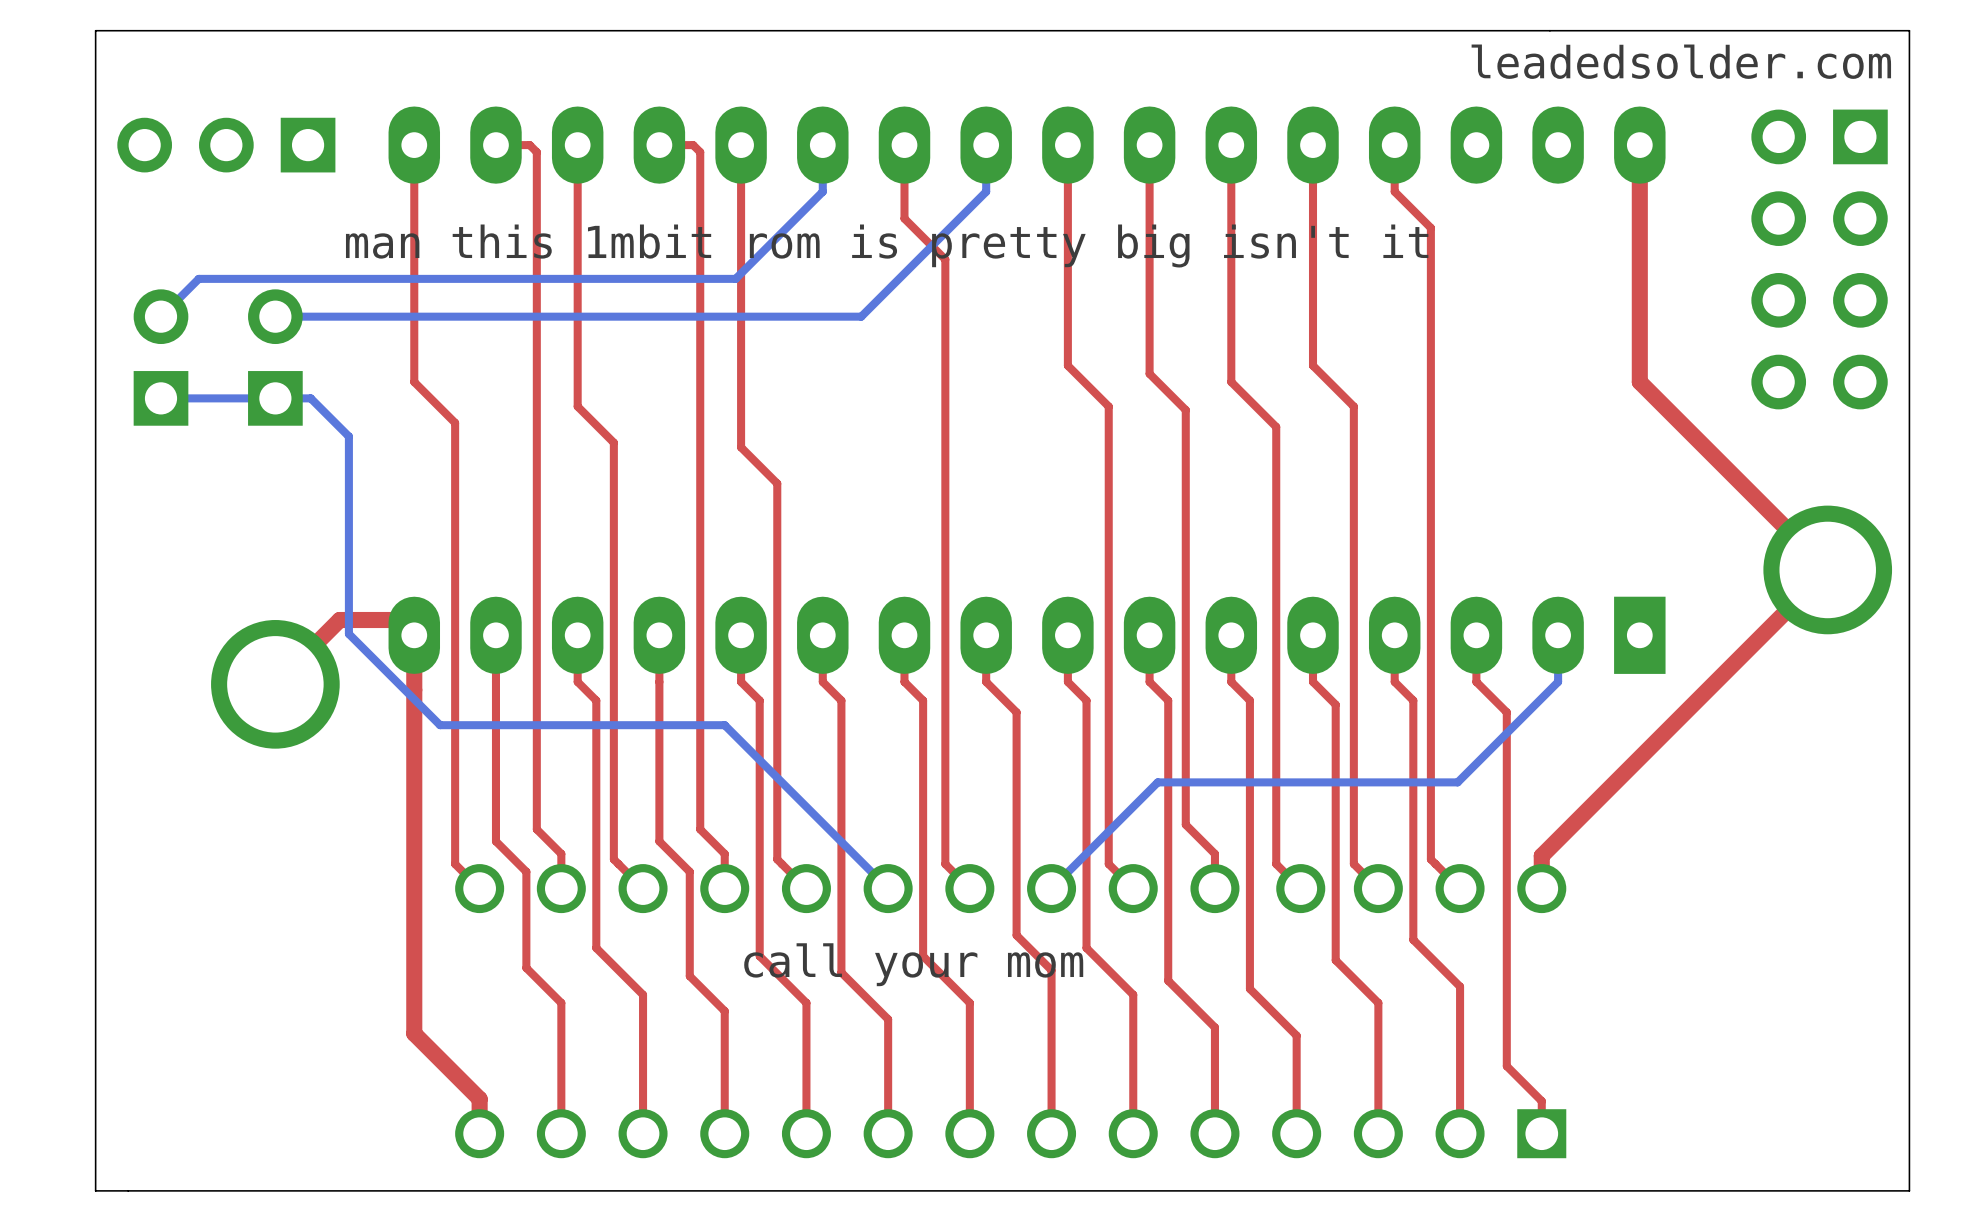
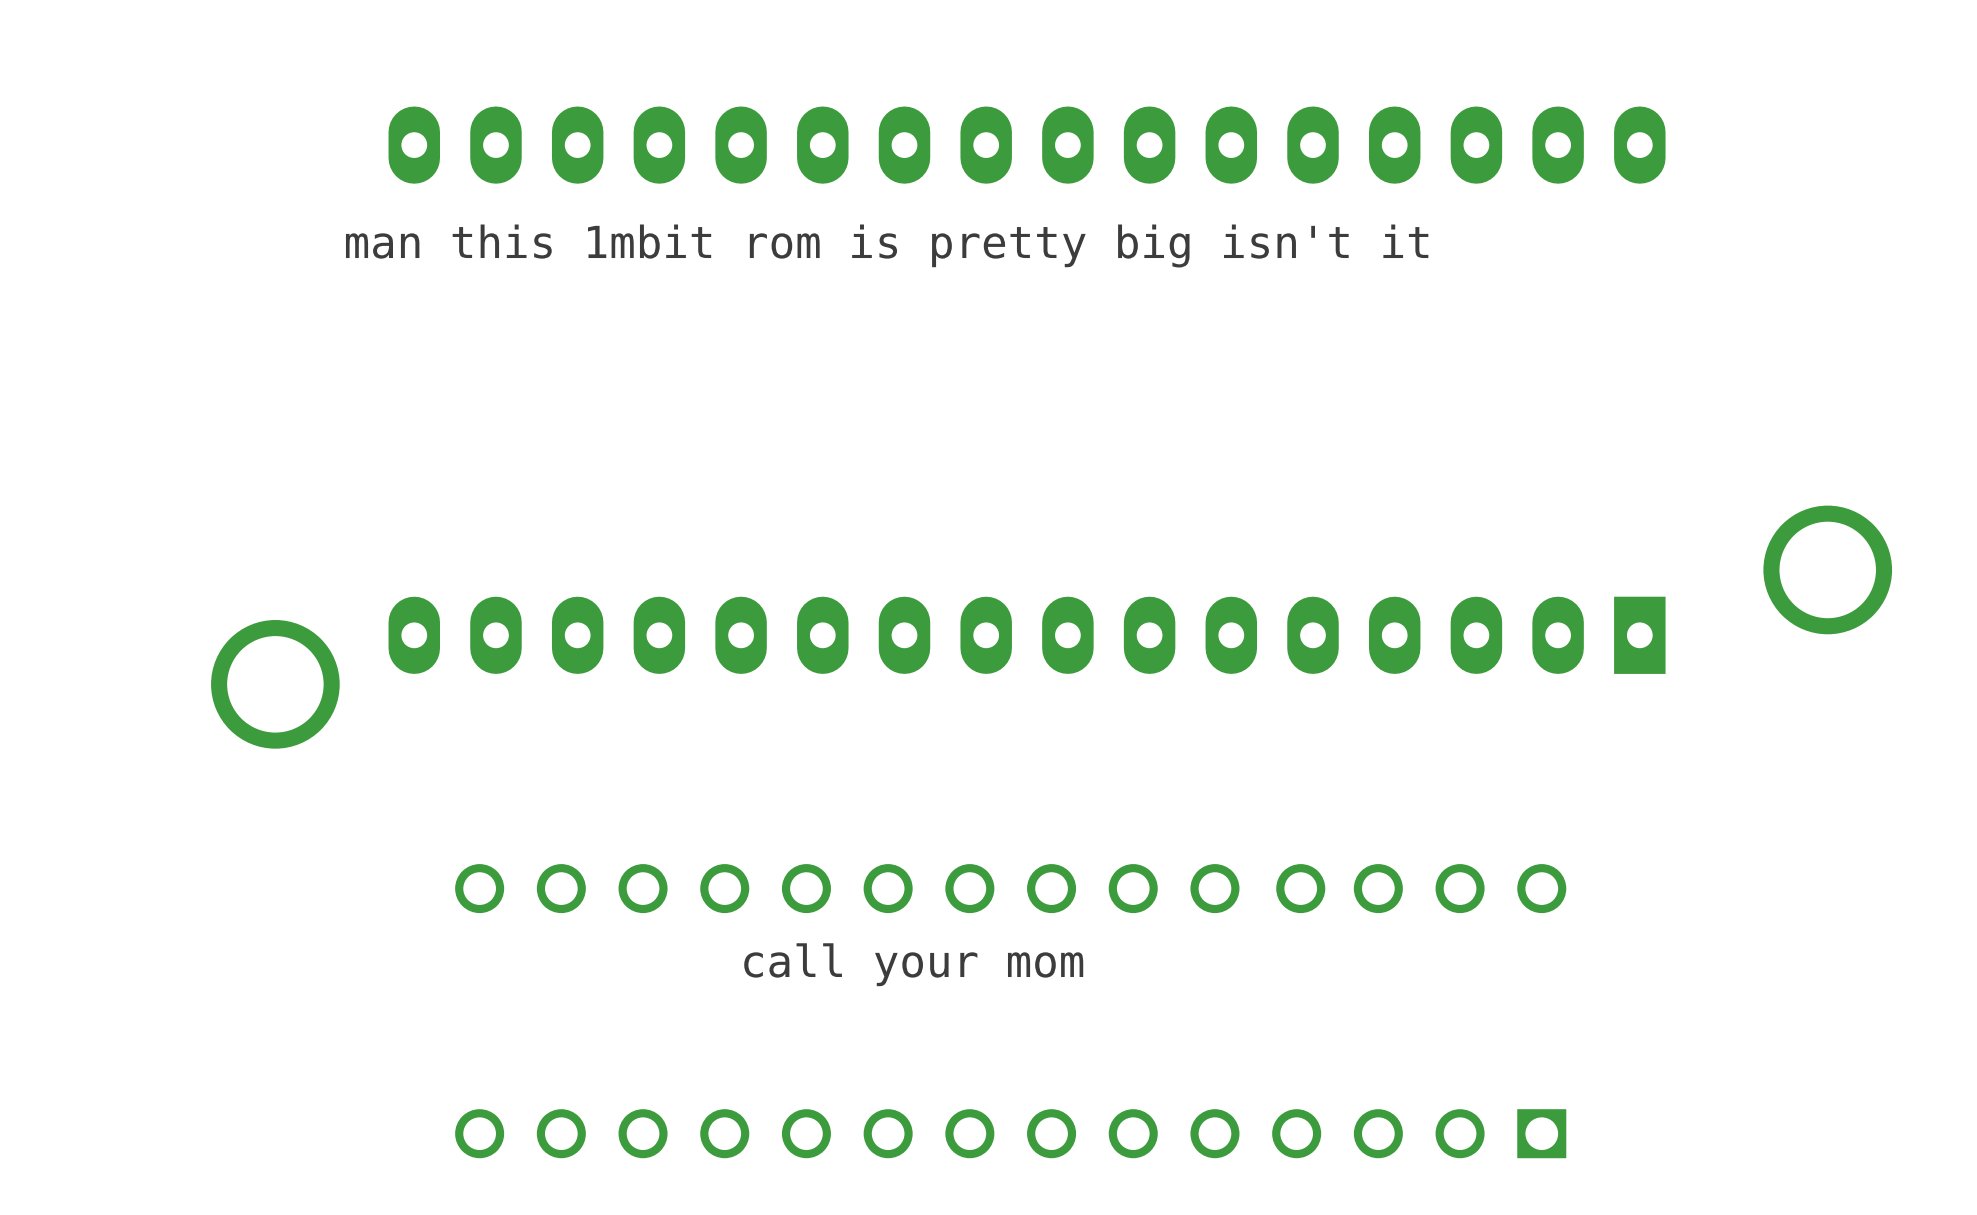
board edge: (1909, 30) (95, 30) (95, 1190) (1909, 1190) (1909, 30) -> none
text: leadedsolder.com (1681, 61) -> none
part: (226, 145) -> none
top track: (414, 145) (414, 382) (455, 422) (455, 864) (479, 888) -> none
top track: (495, 145) (529, 145) (536, 152) (536, 829) (561, 853) (561, 888) -> none
top track: (577, 145) (577, 406) (613, 442) (613, 859) (643, 888) -> none
top track: (659, 145) (693, 145) (700, 152) (700, 829) (724, 853) (724, 888) -> none
top track: (741, 145) (741, 447) (777, 483) (777, 859) (806, 888) -> none
bottom track: (822, 145) (822, 191) (735, 278) (198, 278) (161, 316) -> none
top track: (904, 145) (904, 218) (945, 259) (945, 864) (969, 888) -> none
bottom track: (986, 145) (986, 191) (861, 316) (275, 316) -> none
top track: (1067, 145) (1067, 365) (1108, 406) (1108, 864) (1133, 888) -> none
top track: (1149, 145) (1149, 373) (1185, 410) (1185, 824) (1214, 853) (1214, 888) -> none
top track: (1231, 145) (1231, 382) (1276, 426) (1276, 864) (1300, 888) -> none
top track: (1313, 145) (1313, 365) (1353, 406) (1353, 864) (1378, 888) -> none
top track: (1394, 145) (1394, 191) (1430, 227) (1430, 859) (1460, 888) -> none
top track: (1639, 145) (1639, 382) (1827, 569) (1541, 855) (1541, 888) -> none
part: (1819, 259) -> none
part: (161, 357) -> none
part: (275, 357) -> none
bottom track: (161, 398) (310, 398) (348, 436) (348, 633) (440, 725) (724, 725) (888, 888) -> none
top track: (495, 635) (495, 841) (526, 871) (526, 968) (561, 1002) (561, 1133) -> none
top track: (577, 635) (577, 681) (596, 700) (596, 948) (643, 994) (643, 1133) -> none
top track: (659, 635) (659, 841) (689, 871) (689, 976) (724, 1011) (724, 1133) -> none
top track: (741, 635) (741, 681) (759, 700) (759, 956) (806, 1002) (806, 1133) -> none
top track: (822, 635) (822, 681) (841, 700) (841, 972) (888, 1019) (888, 1133) -> none
top track: (904, 635) (904, 681) (923, 700) (923, 956) (969, 1002) (969, 1133) -> none
top track: (986, 635) (986, 681) (1016, 712) (1016, 935) (1051, 970) (1051, 1133) -> none
top track: (1067, 635) (1067, 681) (1086, 700) (1086, 948) (1133, 994) (1133, 1133) -> none
top track: (1149, 635) (1149, 681) (1168, 700) (1168, 980) (1214, 1027) (1214, 1133) -> none
top track: (1231, 635) (1231, 681) (1249, 700) (1249, 988) (1296, 1035) (1296, 1133) -> none
top track: (1313, 635) (1313, 681) (1335, 704) (1335, 960) (1378, 1002) (1378, 1133) -> none
top track: (1394, 635) (1394, 681) (1413, 700) (1413, 939) (1460, 986) (1460, 1133) -> none
top track: (1476, 635) (1476, 681) (1506, 712) (1506, 1066) (1541, 1101) (1541, 1133) -> none
bottom track: (1558, 635) (1558, 681) (1457, 782) (1157, 782) (1051, 888) -> none
top track: (275, 684) (339, 620) (398, 620) (414, 635) (414, 1033) (479, 1099) (479, 1133) -> none

